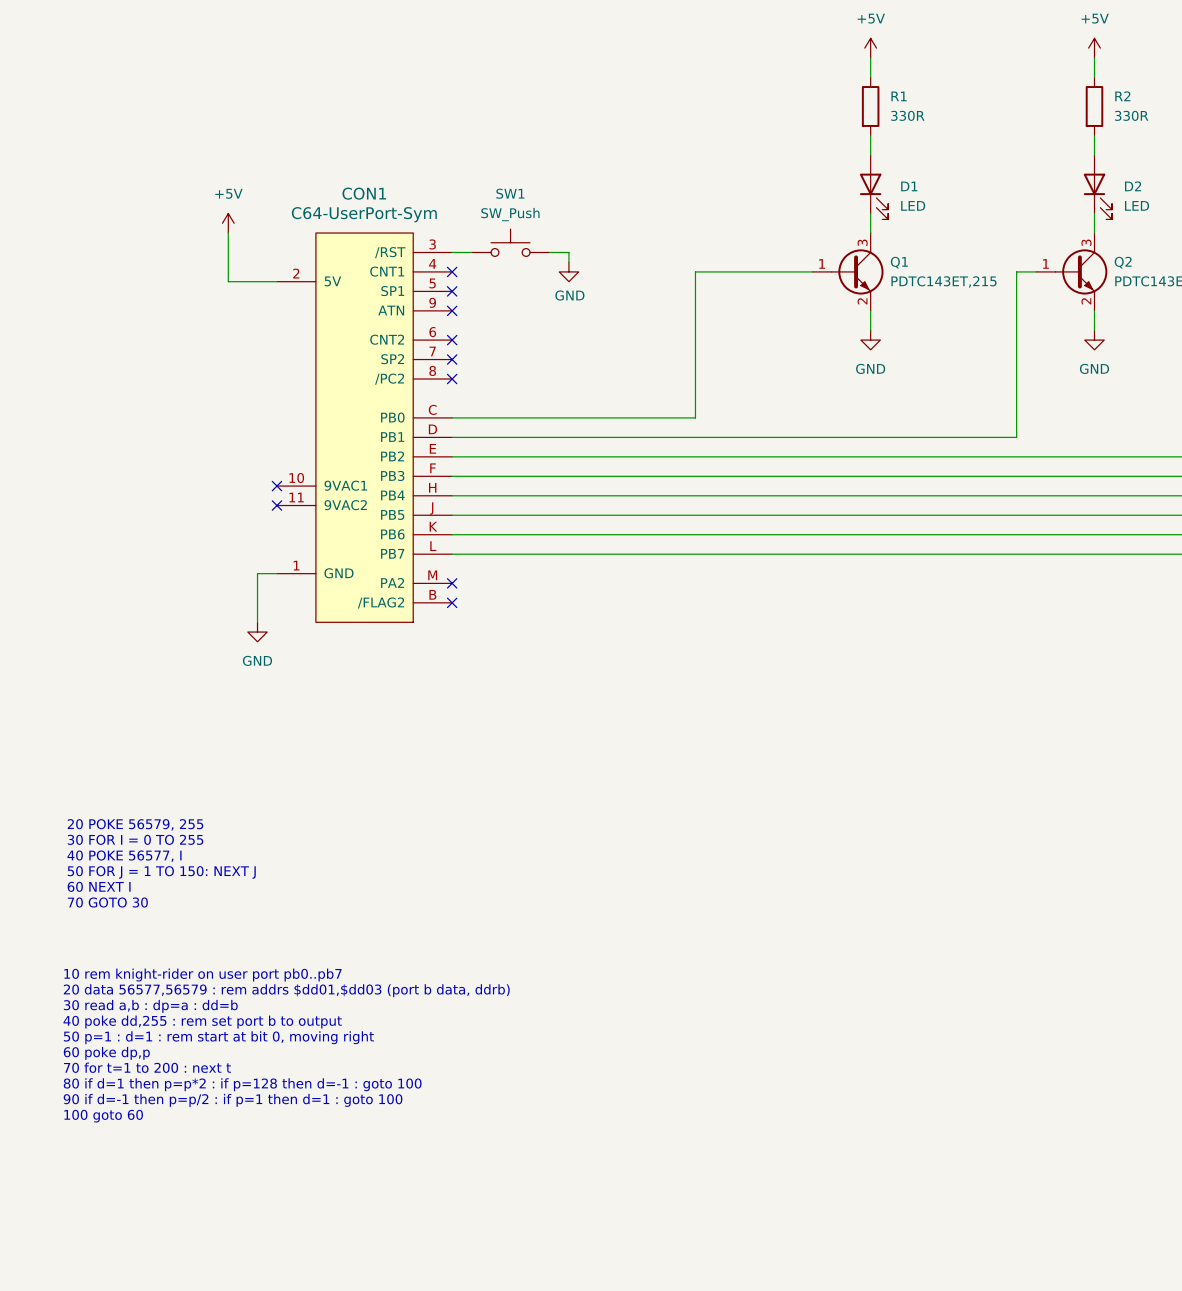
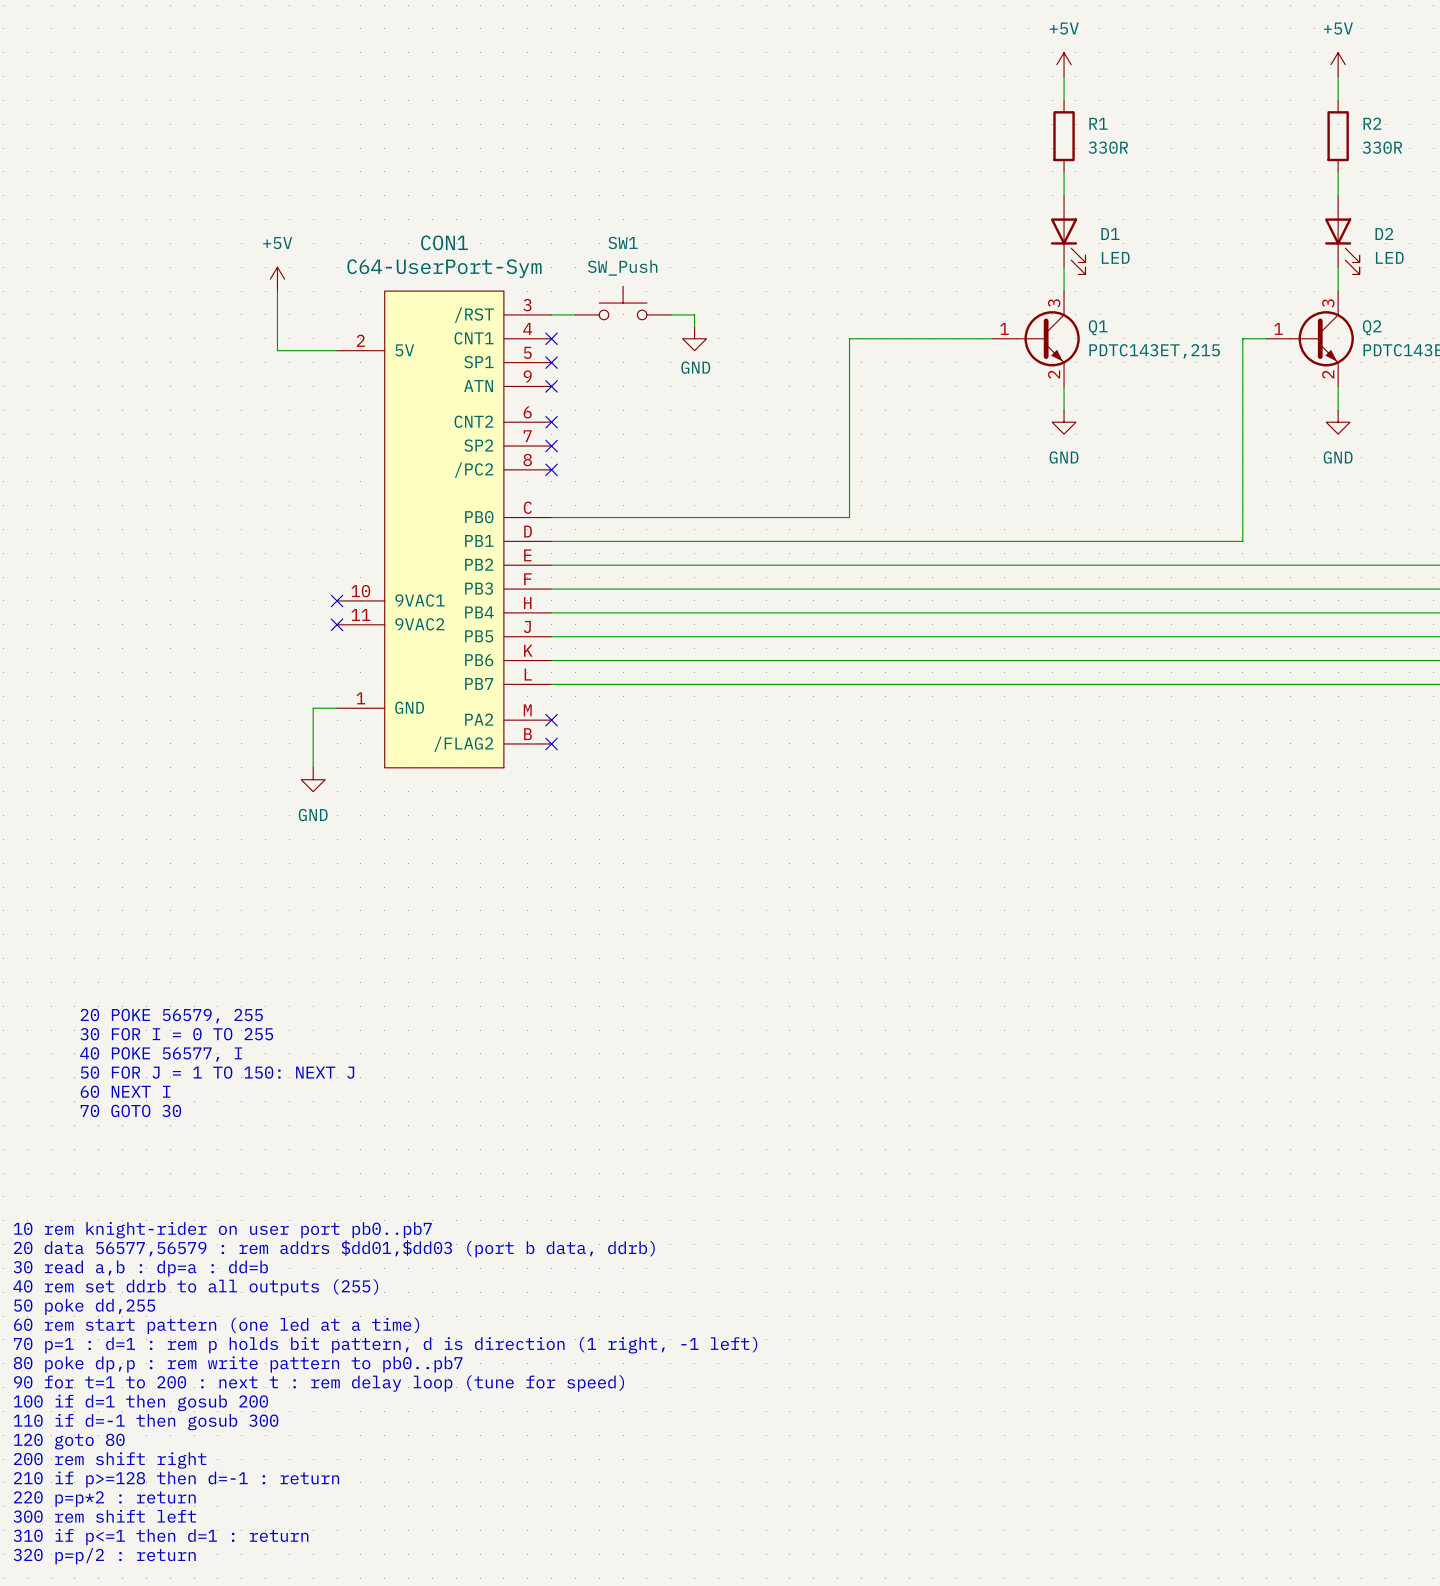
text position: 10 rem knight-rider on user port pb0..pb7 (202, 975) -> 10 rem knight-rider on user port pb0..pb7 (222, 1230)
text position: 20 data 56577,56579 : rem addrs $dd01,$dd03 (port b data, ddrb) (286, 990) -> 20 data 56577,56579 : rem addrs $dd01,$dd03 (port b data, ddrb) (334, 1248)
text position: 30 read a,b : dp=a : dd=b (150, 1006) -> 30 read a,b : dp=a : dd=b (140, 1268)
text: 40 poke dd,255 : rem set port b to output (202, 1022) -> none
text: 50 p=1 : d=1 : rem start at bit 0, moving right (218, 1037) -> none
text: none -> 40 rem set ddrb to all outputs (255) (195, 1287)
text: 60 poke dp,p (106, 1053) -> 50 poke dd,255 (84, 1306)
text: 70 for t=1 to 200 : next t (147, 1067) -> none
text: none -> 60 rem start pattern (one led at a time) (216, 1325)
text: 80 if d=1 then p=p*2 : if p=128 then d=-1 : goto 100 (242, 1084) -> none
text: none -> 70 p=1 : d=1 : rem p holds bit pattern, d is direction (1 right, -1 left) (385, 1345)
text: 90 if d=-1 then p=p/2 : if p=1 then d=1 : goto 100 (233, 1100) -> none
text: none -> 80 poke dp,p : rem write pattern to pb0..pb7 (238, 1364)
text: 100 goto 60 (103, 1116) -> none
text: none -> 90 for t=1 to 200 : next t : rem delay loop (tune for speed) (319, 1383)
text: none -> 100 if d=1 then gosub 200 (140, 1402)
text: none -> 110 if d=-1 then gosub 300 (146, 1422)
text: none -> 120 goto 80 (69, 1441)
text: none -> 200 rem shift right (110, 1460)
text: none -> 210 if p>=128 then d=-1 : return (176, 1479)
text: none -> 220 p=p*2 : return (104, 1499)
text: none -> 300 rem shift left (104, 1516)
text: none -> 310 if p<=1 then d=1 : return (161, 1537)
text: none -> 320 p=p/2 : return (104, 1556)

